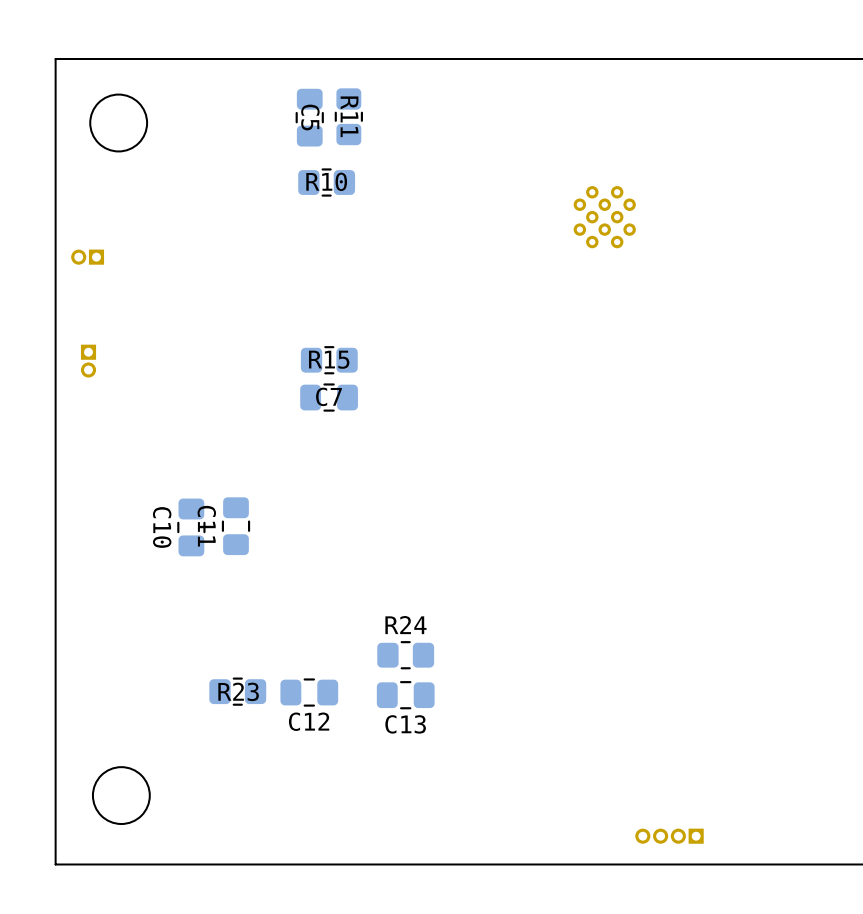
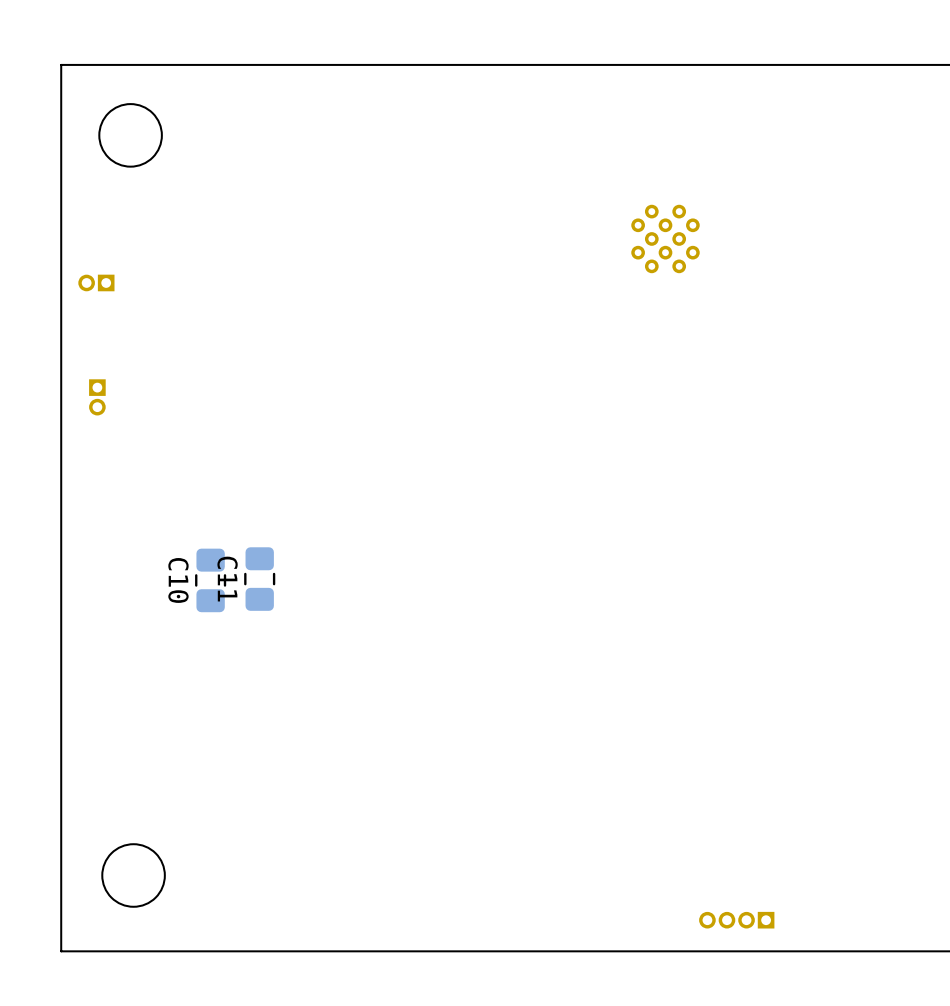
R11: (348, 116) -> none
C5: (309, 117) -> none
R10: (326, 182) -> none
R15: (329, 360) -> none
C7: (329, 397) -> none
R24: (405, 655) -> none
R23: (237, 691) -> none
C12: (309, 692) -> none
C13: (405, 695) -> none

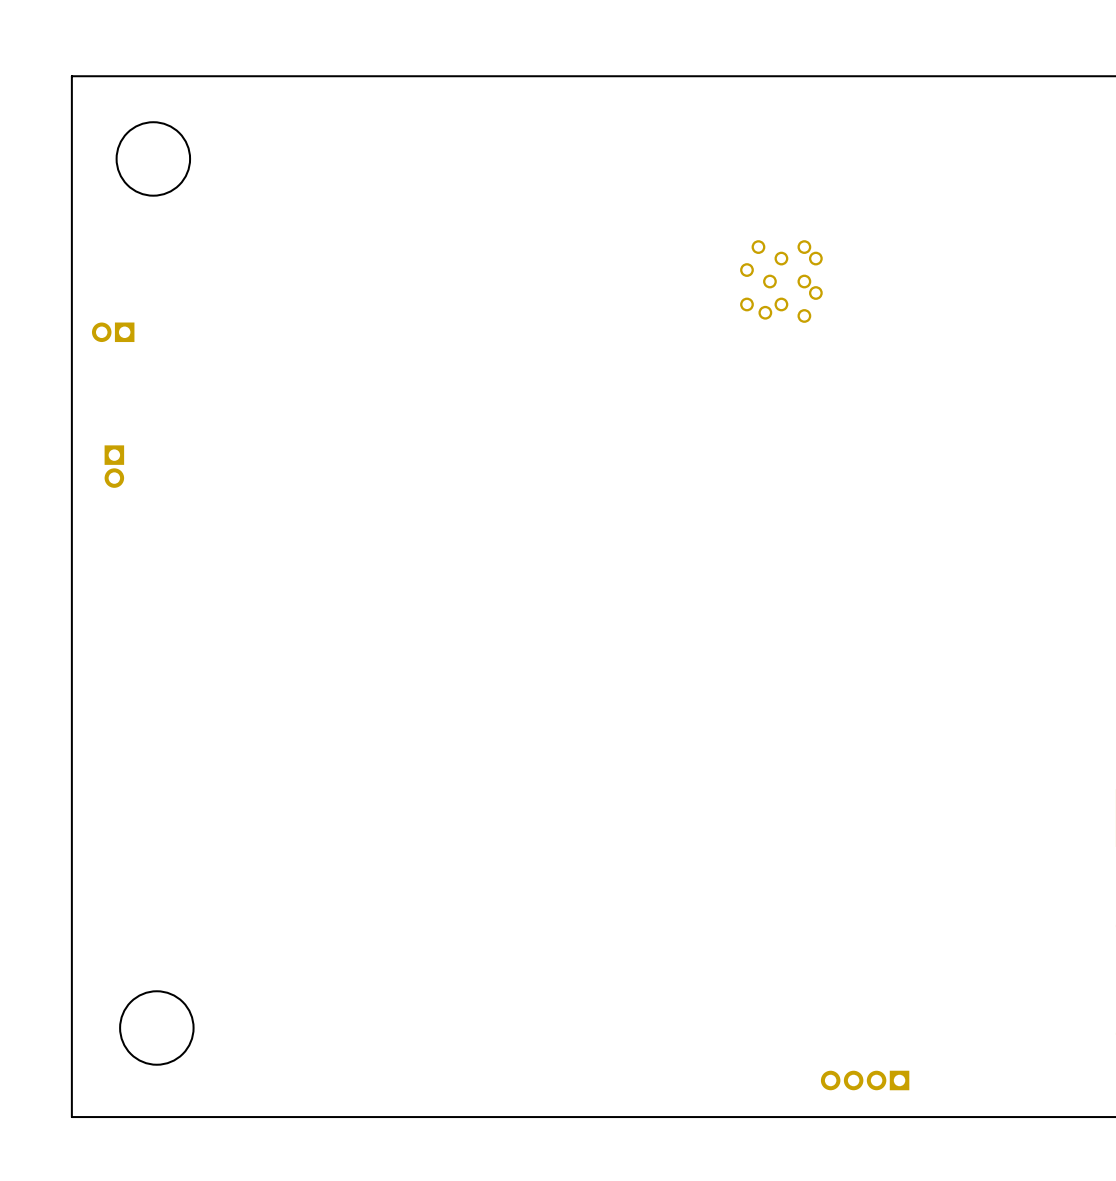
part footprint: [631, 204, 700, 274] -> [740, 240, 823, 323]
C11: (259, 579) -> none
C10: (210, 580) -> none

